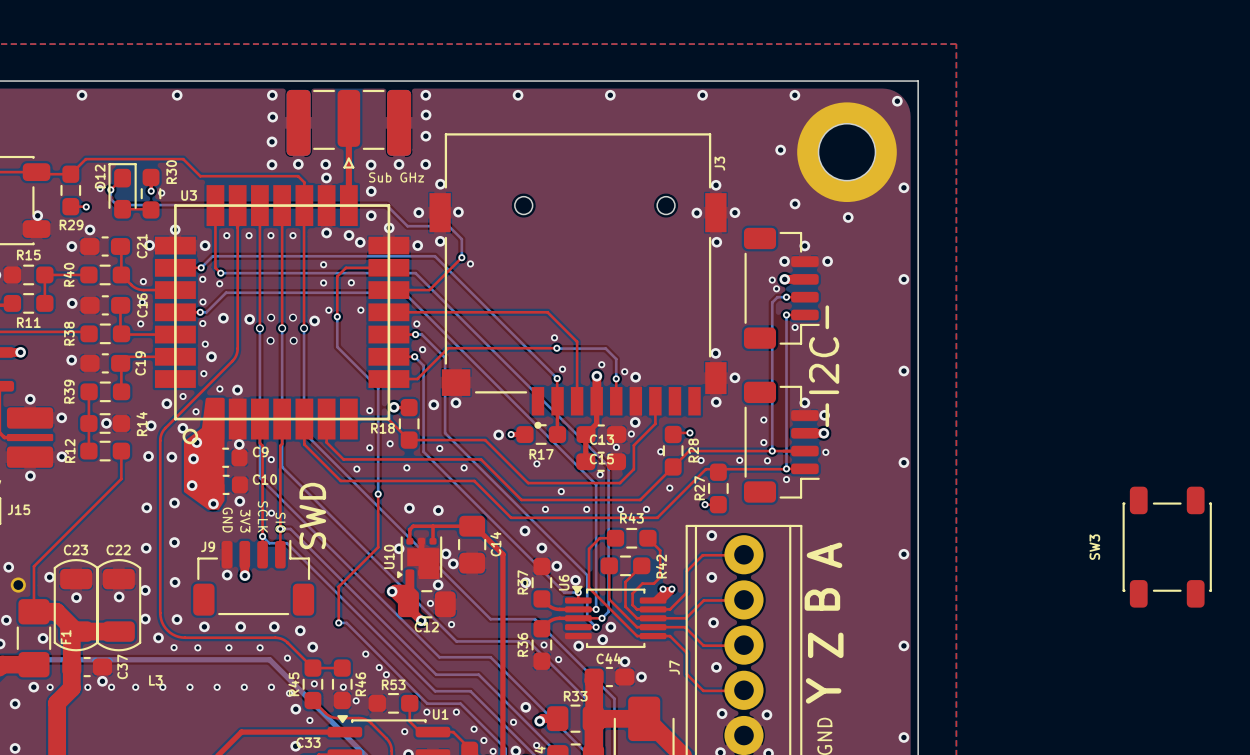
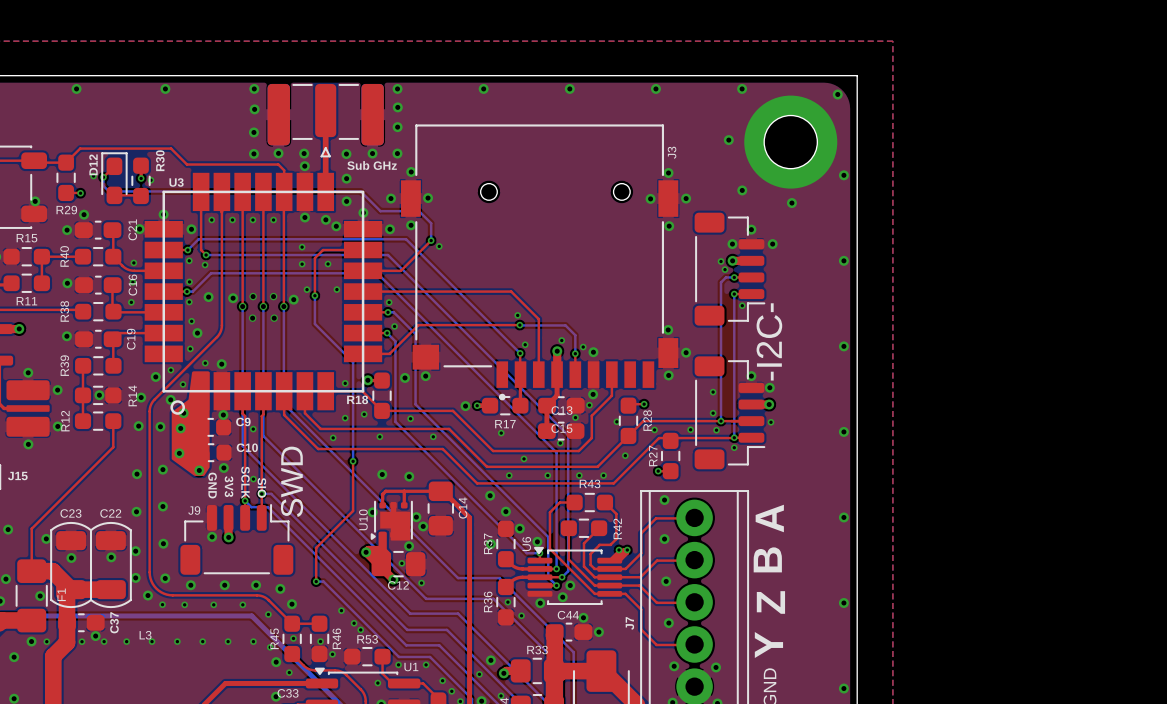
SW3: (1167, 547) -> none
part: (18, 585) -> none

